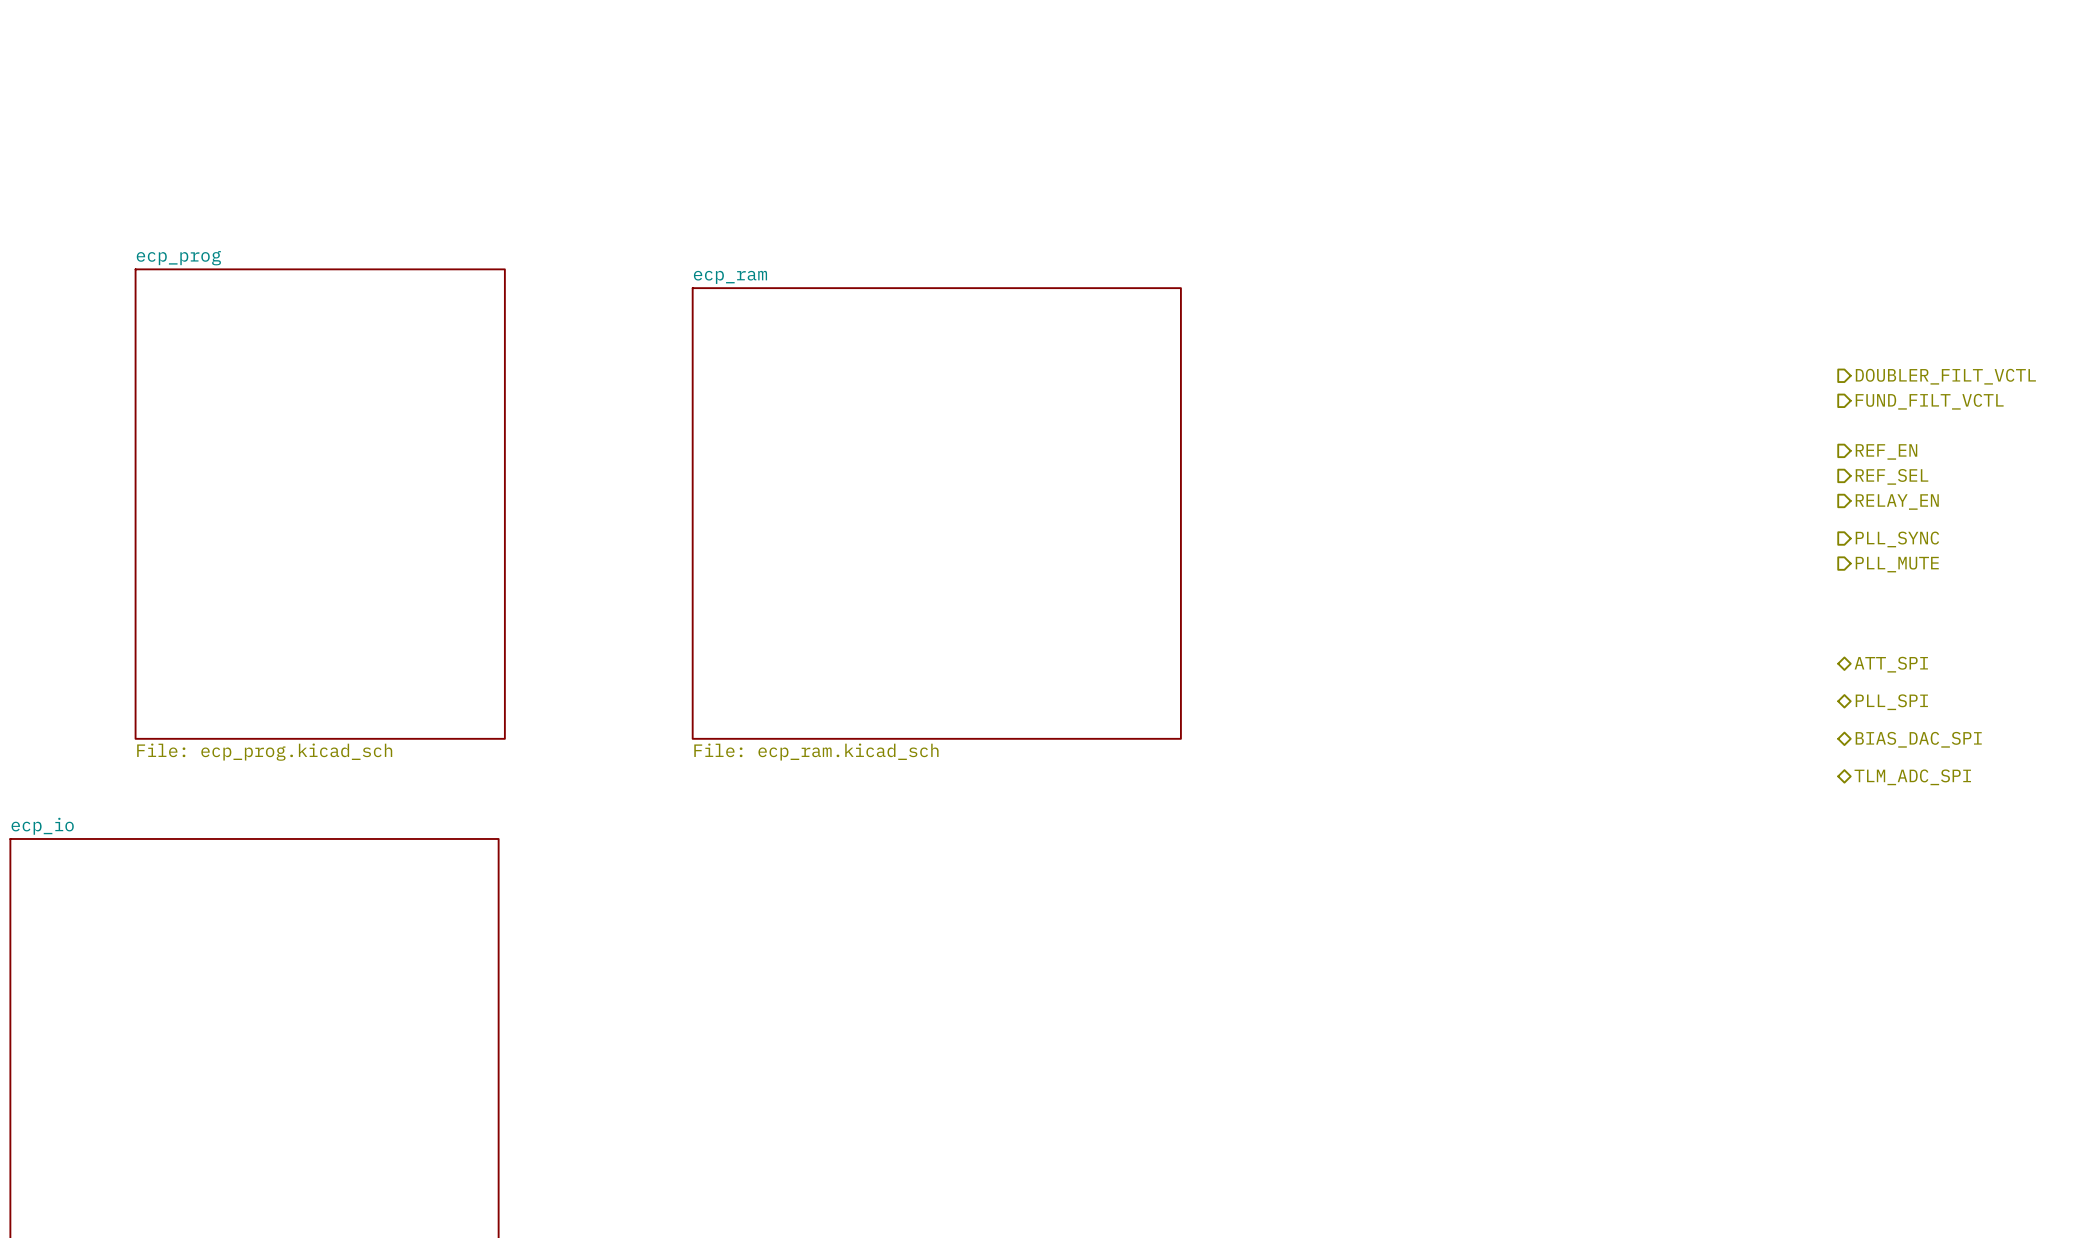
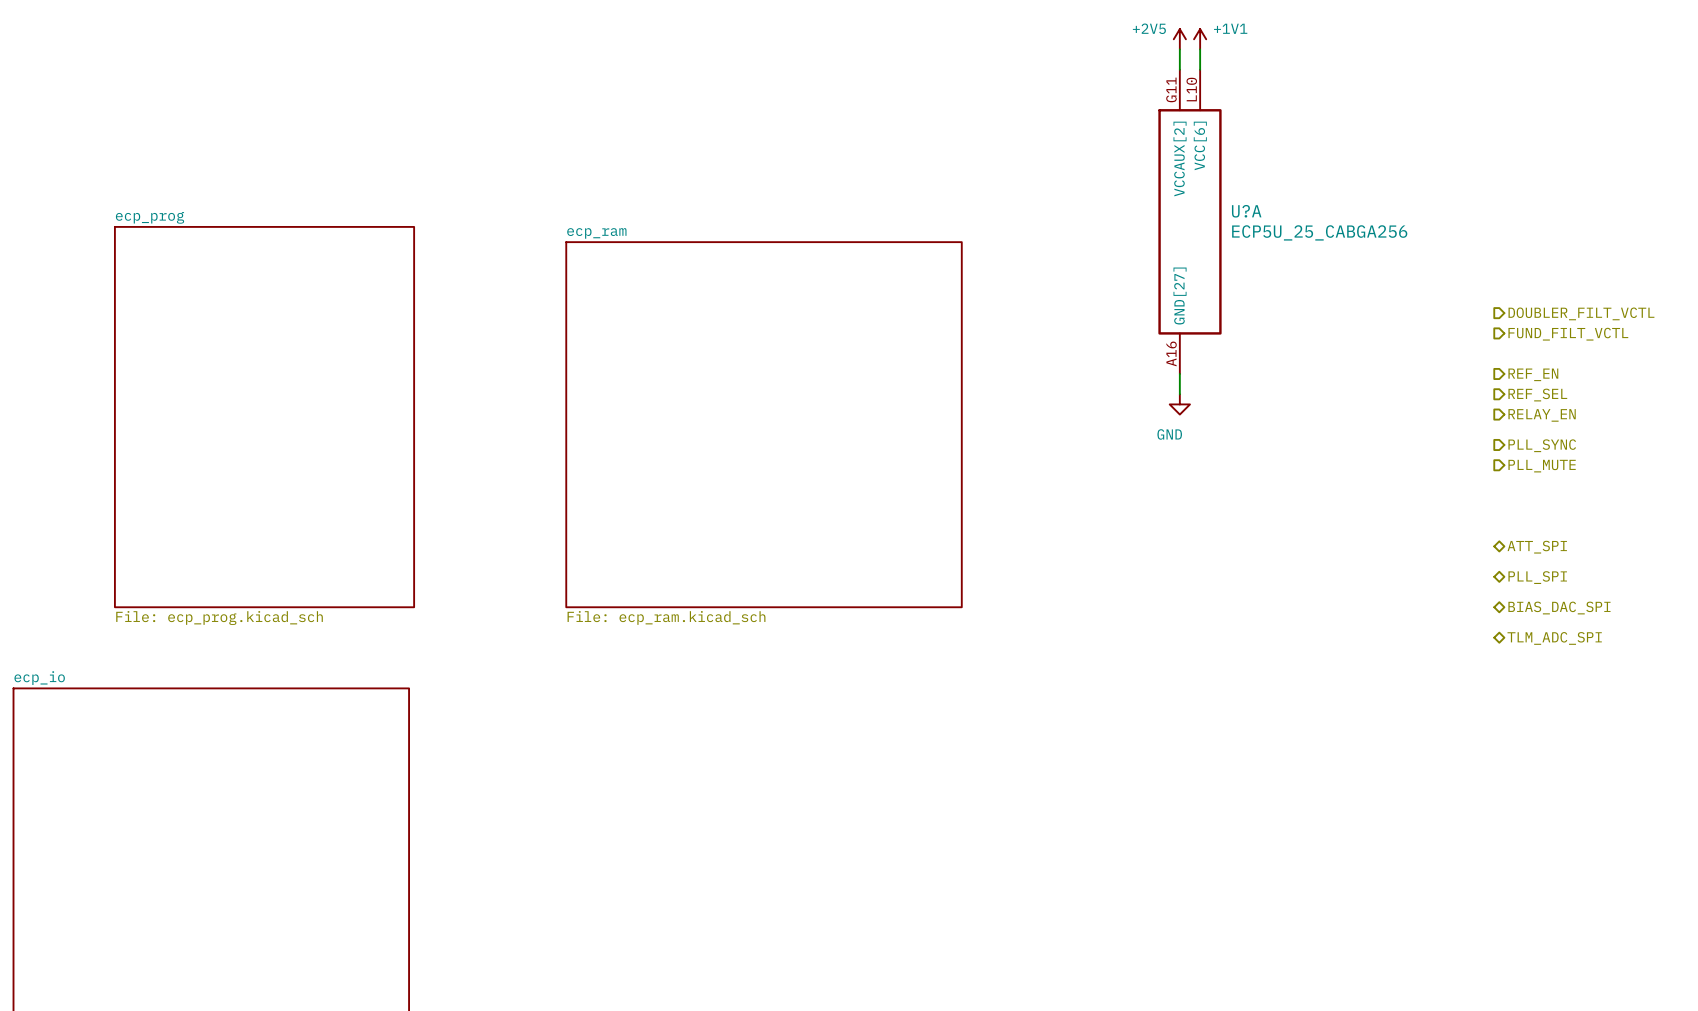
power symbol: none -> +2V5 (1179, 39)
power symbol: none -> +1V1 (1200, 39)
wire: none -> (1179, 49) (1179, 69)
wire: none -> (1200, 49) (1200, 69)
U?A: none -> ECP5U_25_CABGA256 (1189, 221)
wire: none -> (1179, 373) (1179, 394)
power symbol: none -> GND (1179, 404)

